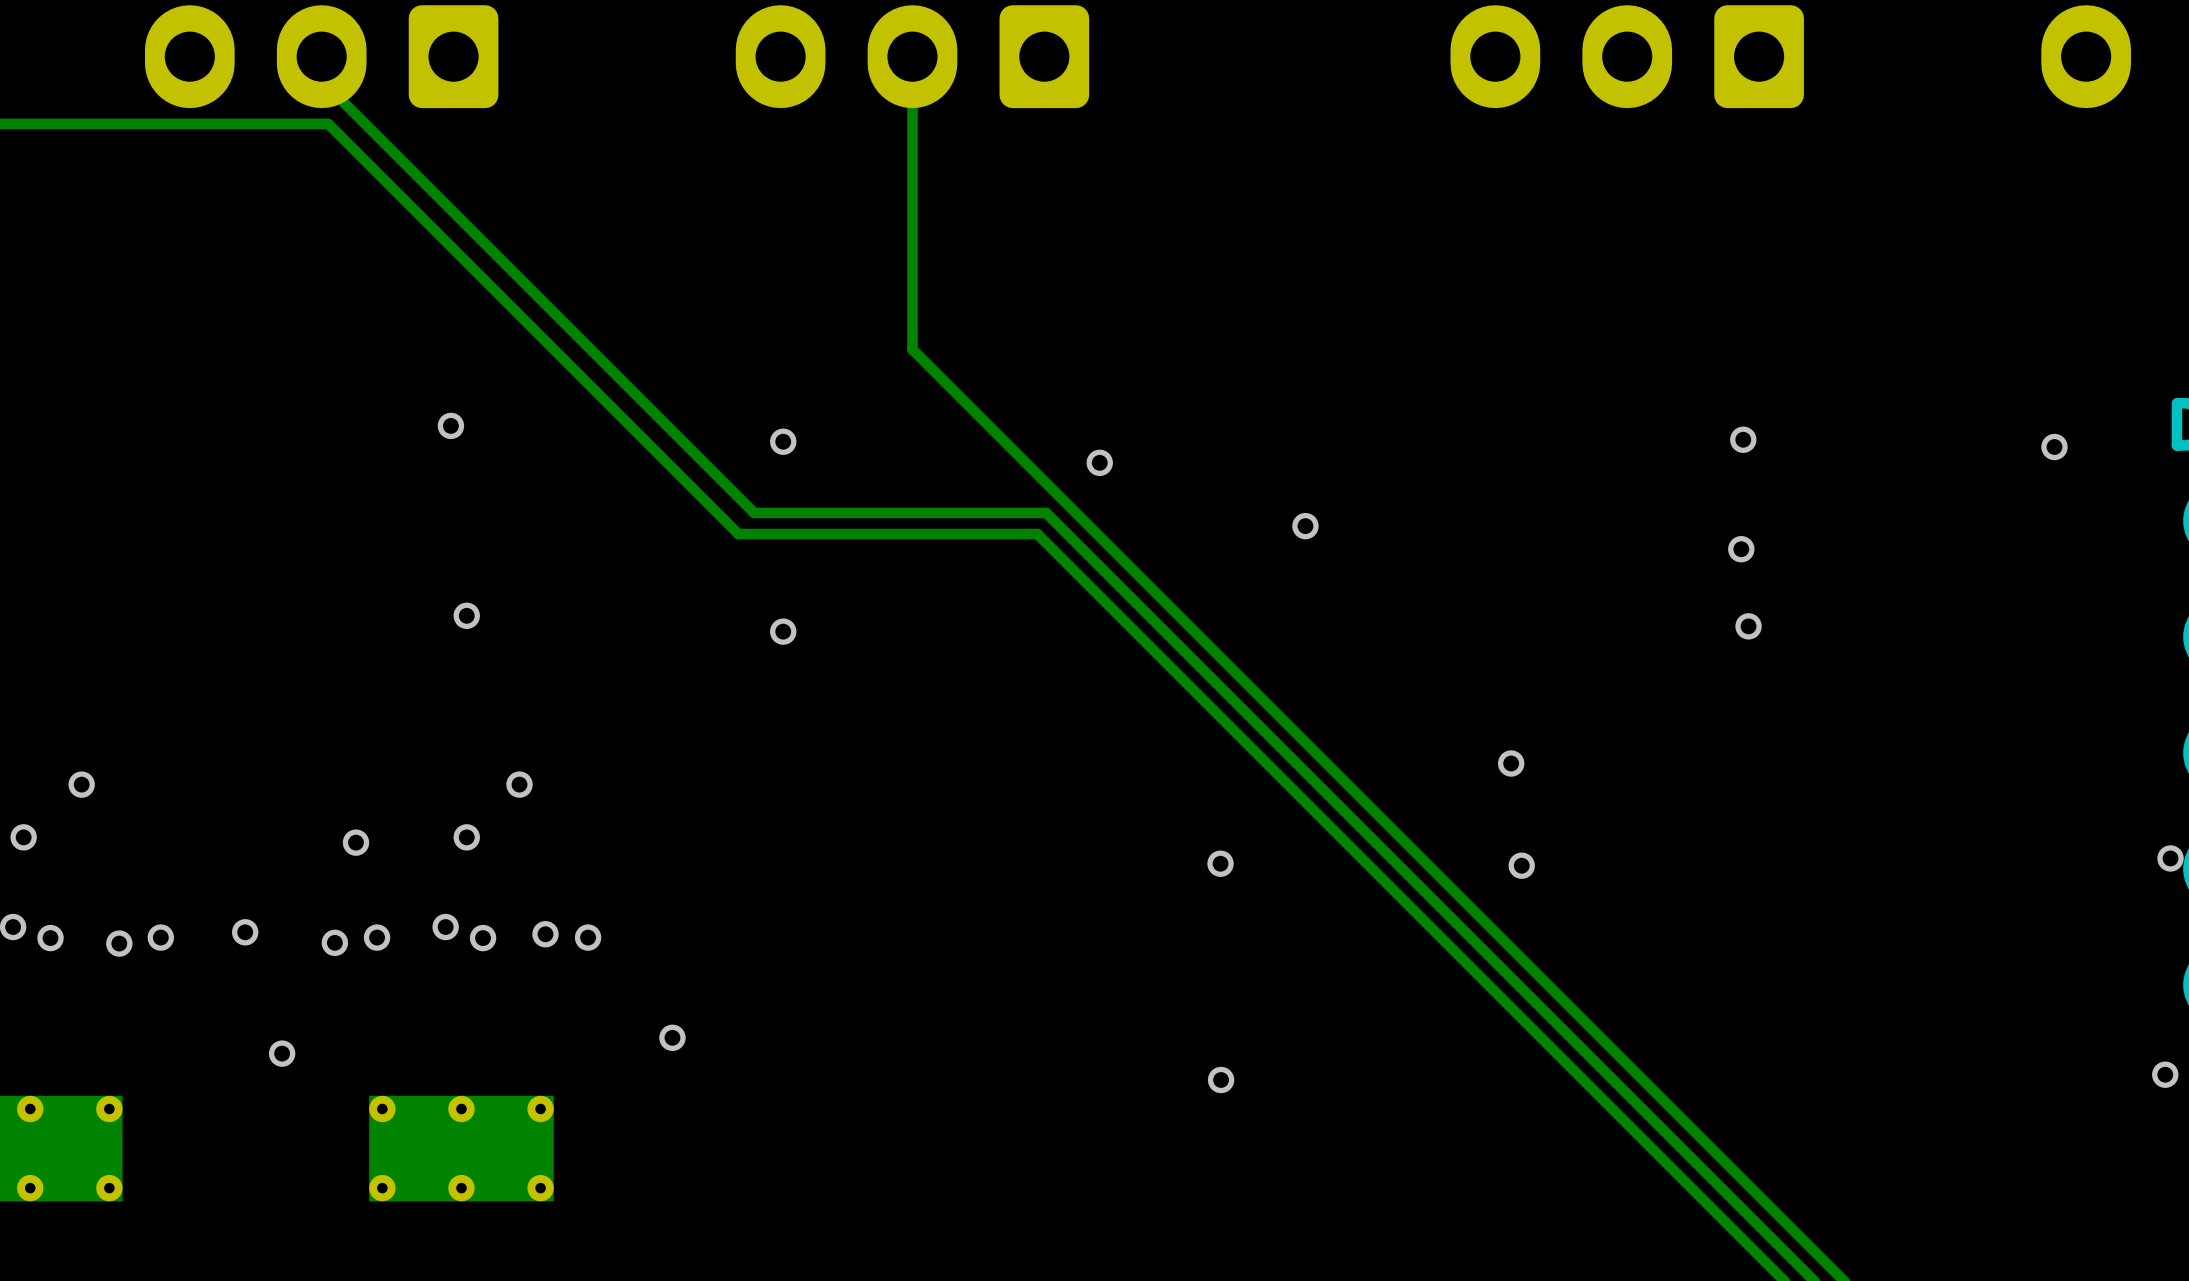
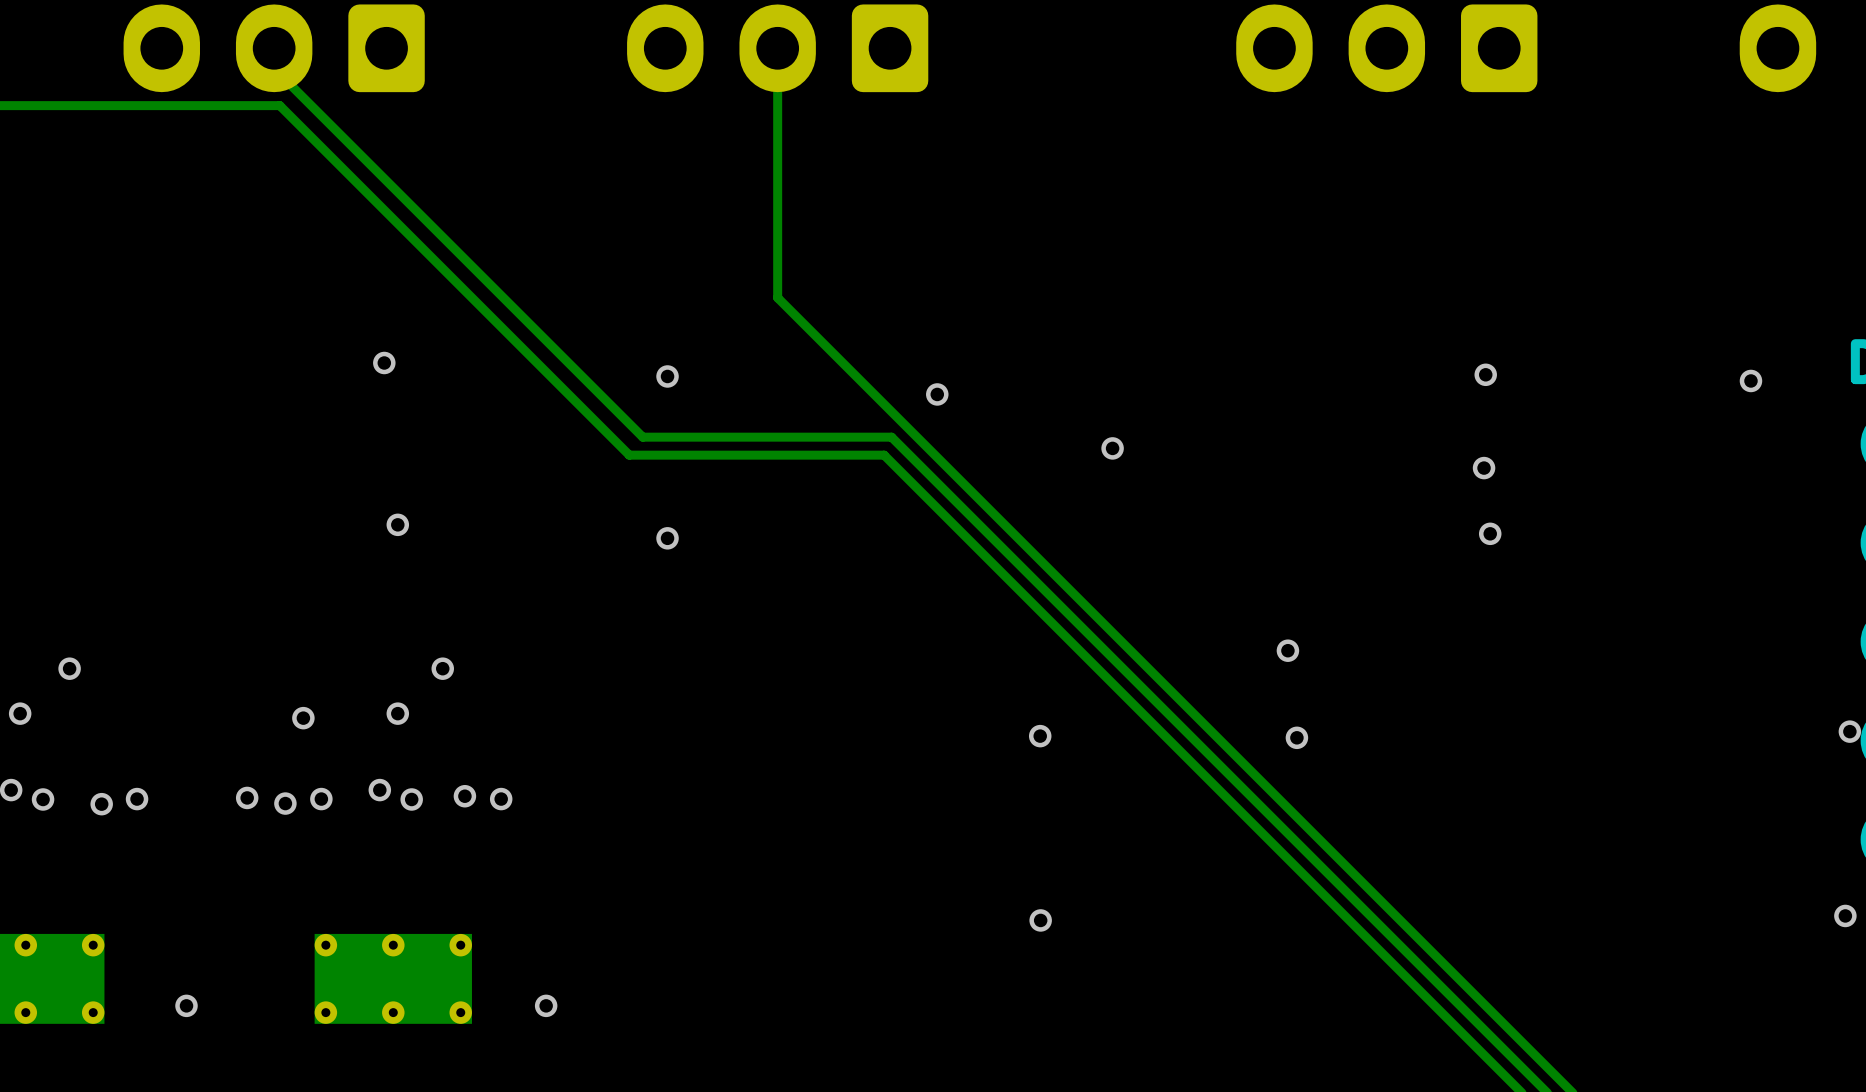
via position: (245, 932) -> (247, 797)
via position: (672, 1037) -> (546, 1005)
via: (282, 1053) -> none
via: none -> (186, 1005)

